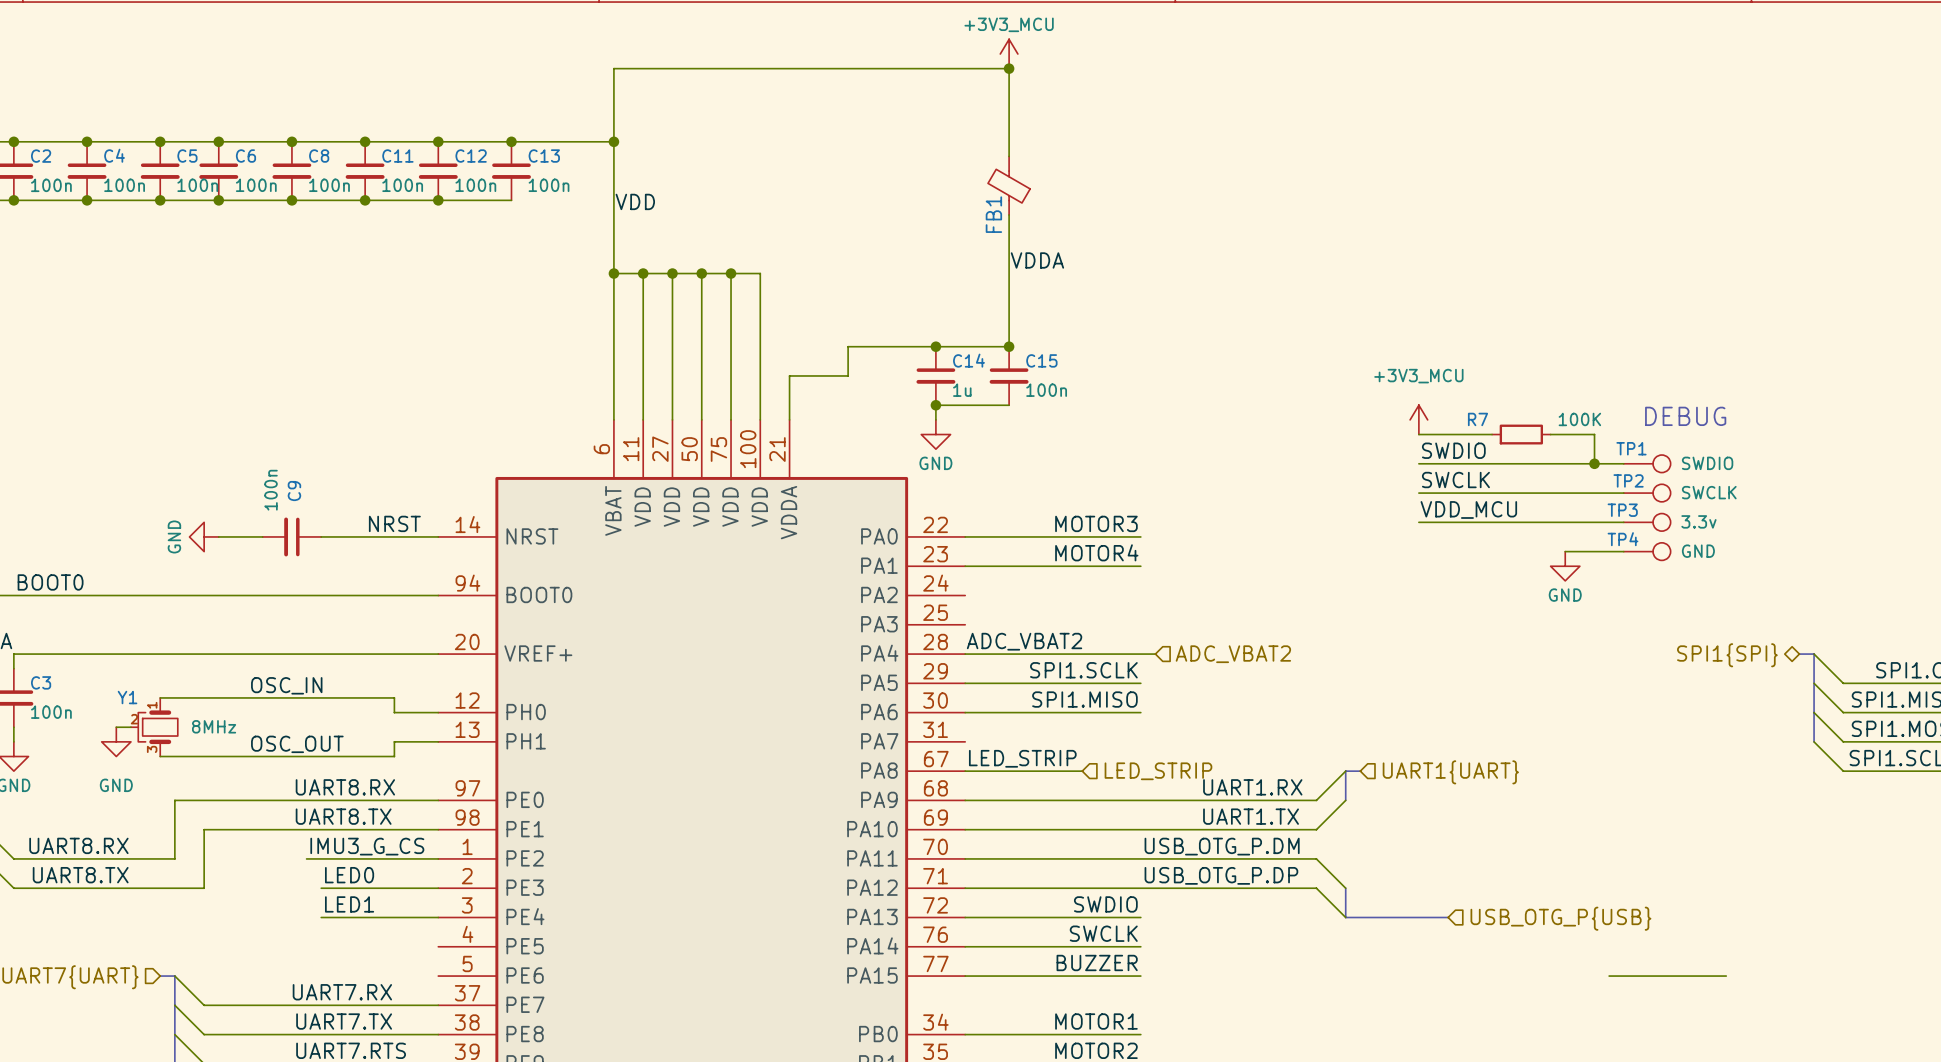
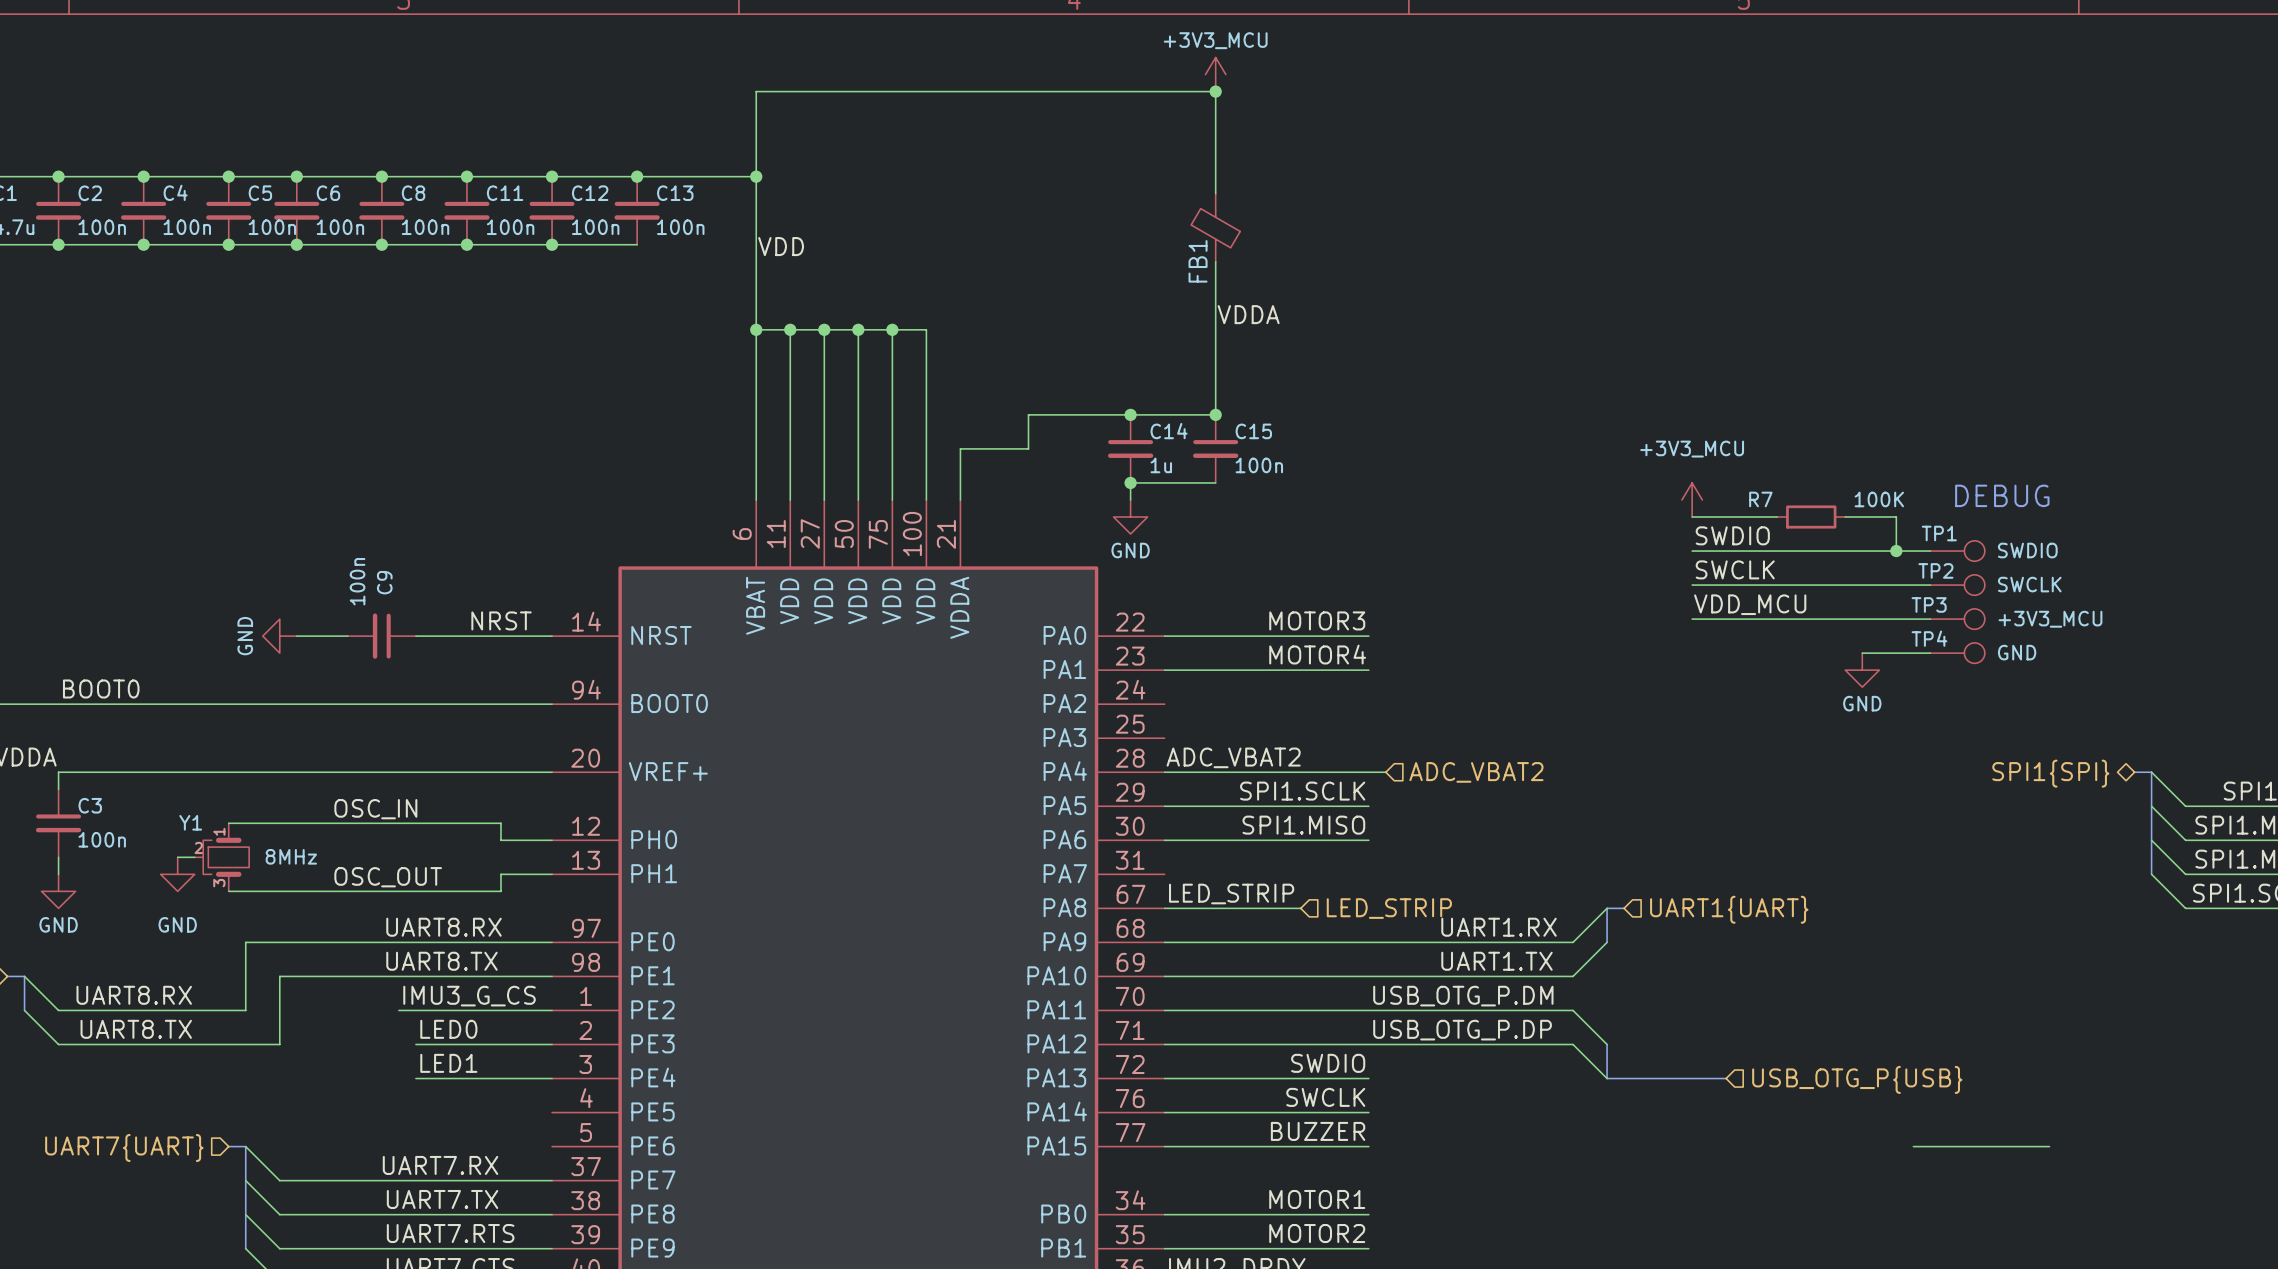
TP3 value: 3.3v (1698, 521) -> +3V3_MCU (2050, 619)

